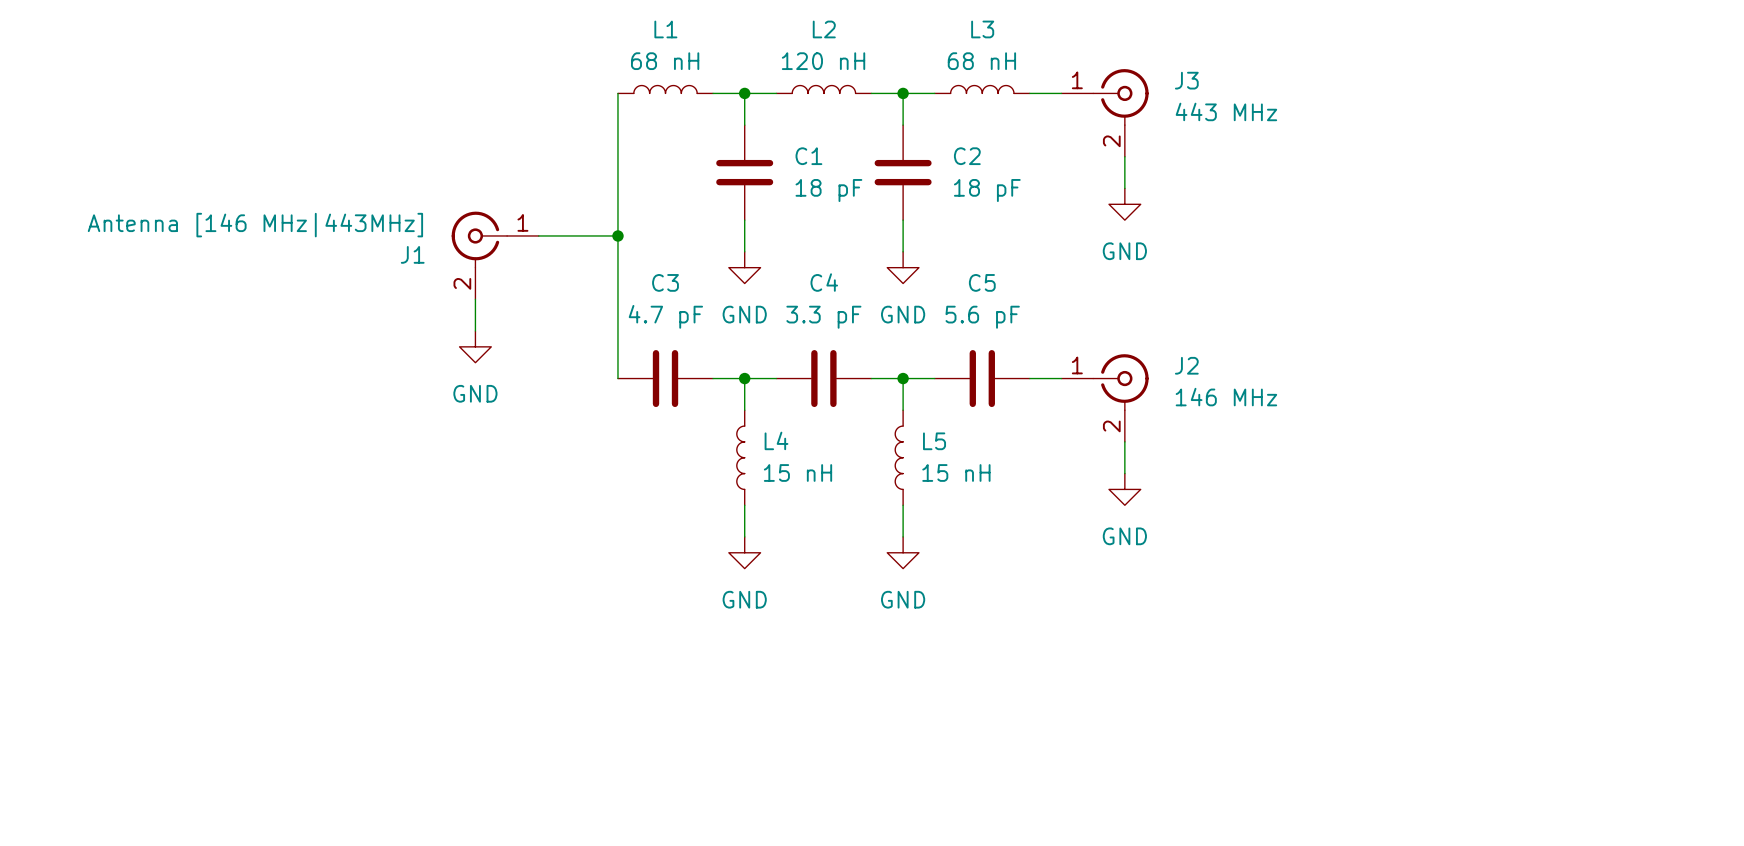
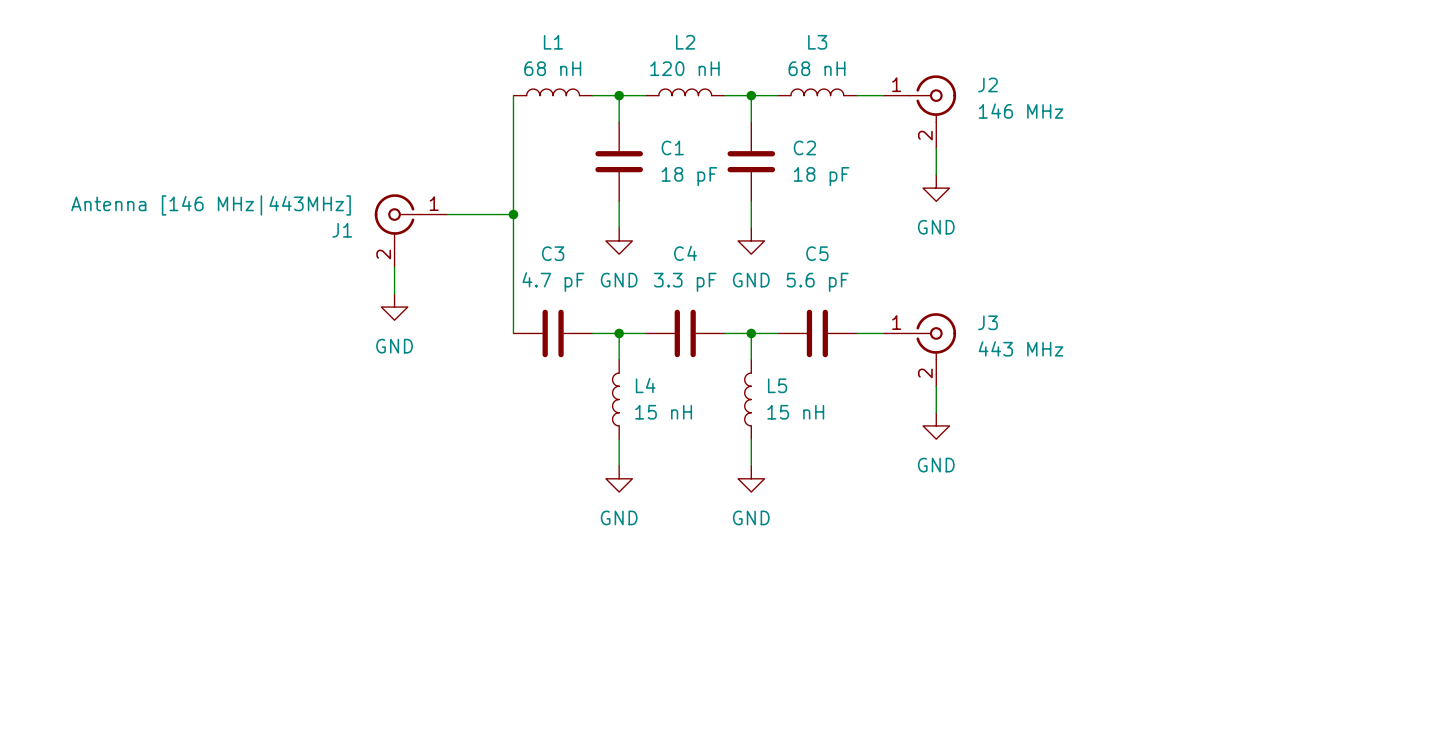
J3 name: J3 (1186, 80) -> J2 (987, 84)
J3 value: 443 MHz (1226, 111) -> 146 MHz (1021, 111)
J2 name: J2 (1186, 365) -> J3 (987, 322)
J2 value: 146 MHz (1226, 397) -> 443 MHz (1021, 348)

